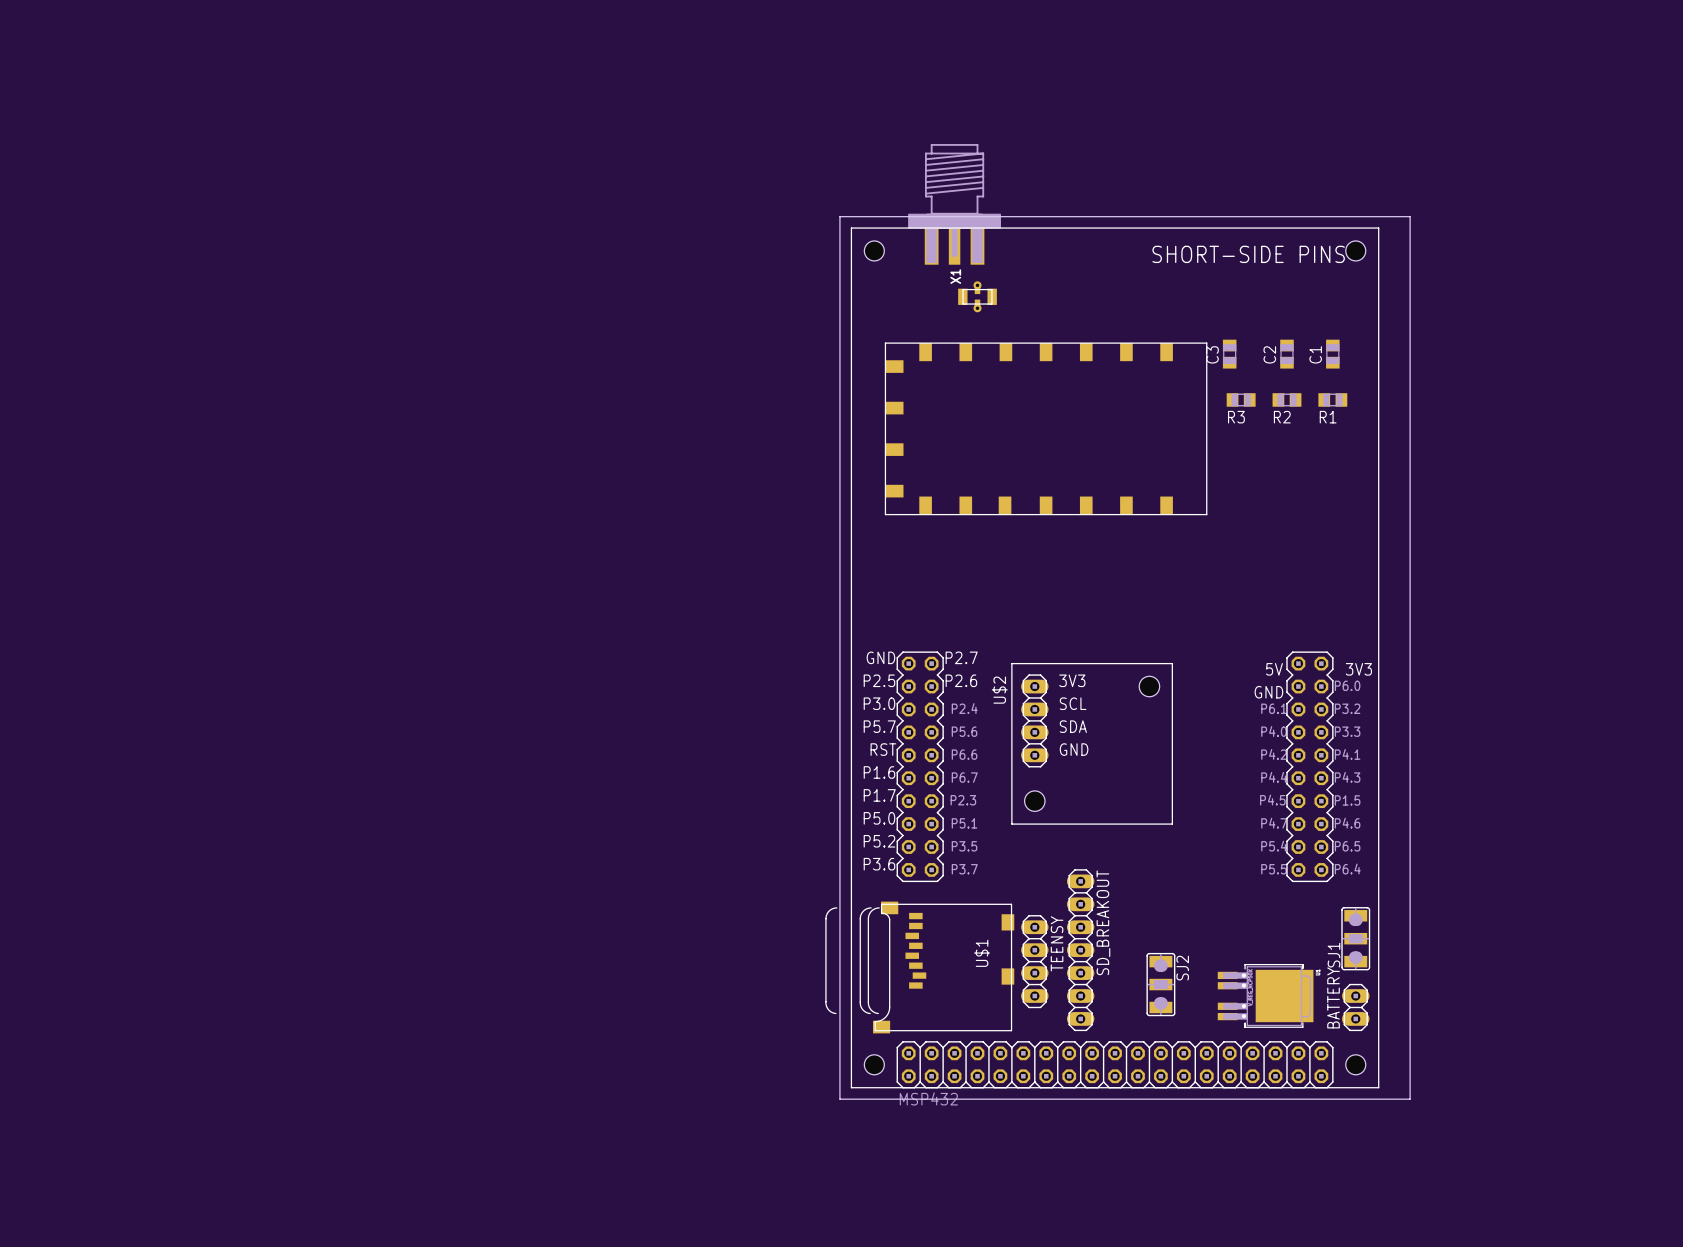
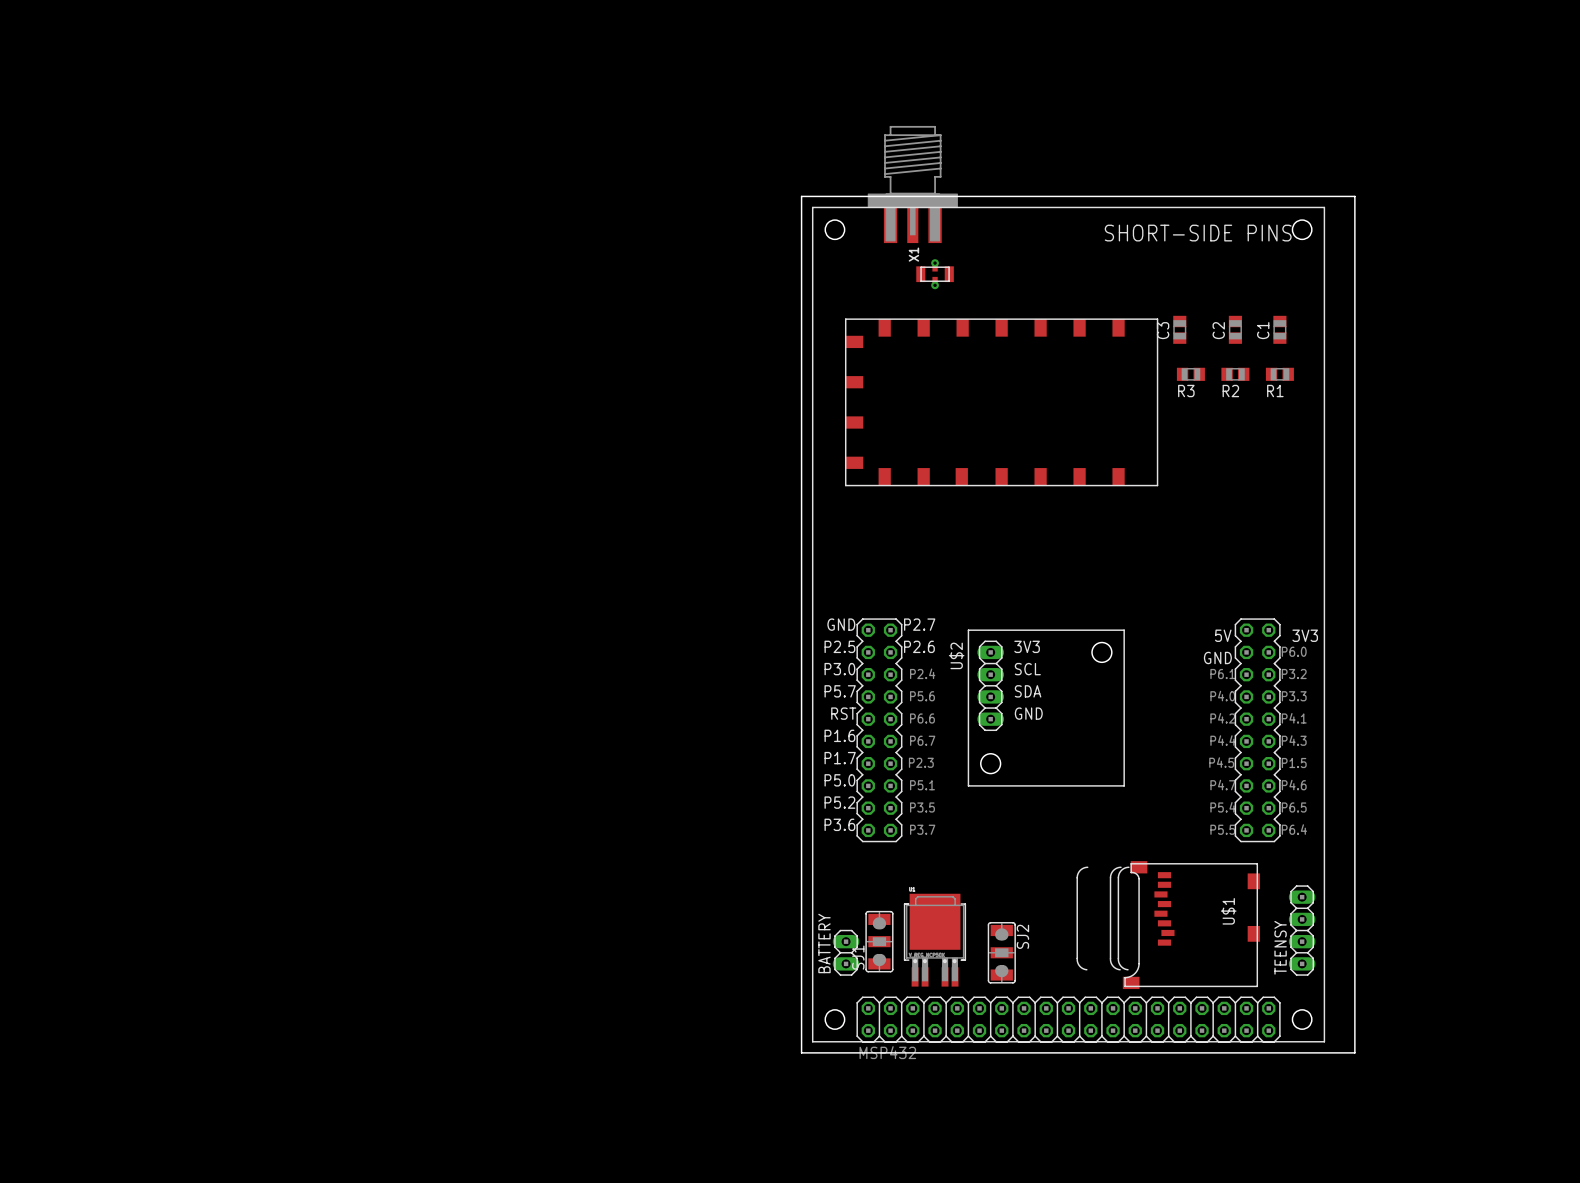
SJ1 position: (1355, 938) -> (879, 941)
SD_BREAKOUT: (1080, 950) -> none
TEENSY: (1034, 961) -> none
U$1 position: (919, 967) -> (1168, 925)
TEENSY: none -> (1302, 930)
SJ2 position: (1160, 984) -> (1001, 952)
part rotation: 0° (1265, 995) -> 90° counterclockwise (934, 940)
part position: (1265, 995) -> (934, 940)
BATTERY: none -> (846, 952)
BATTERY: (1355, 1007) -> none

